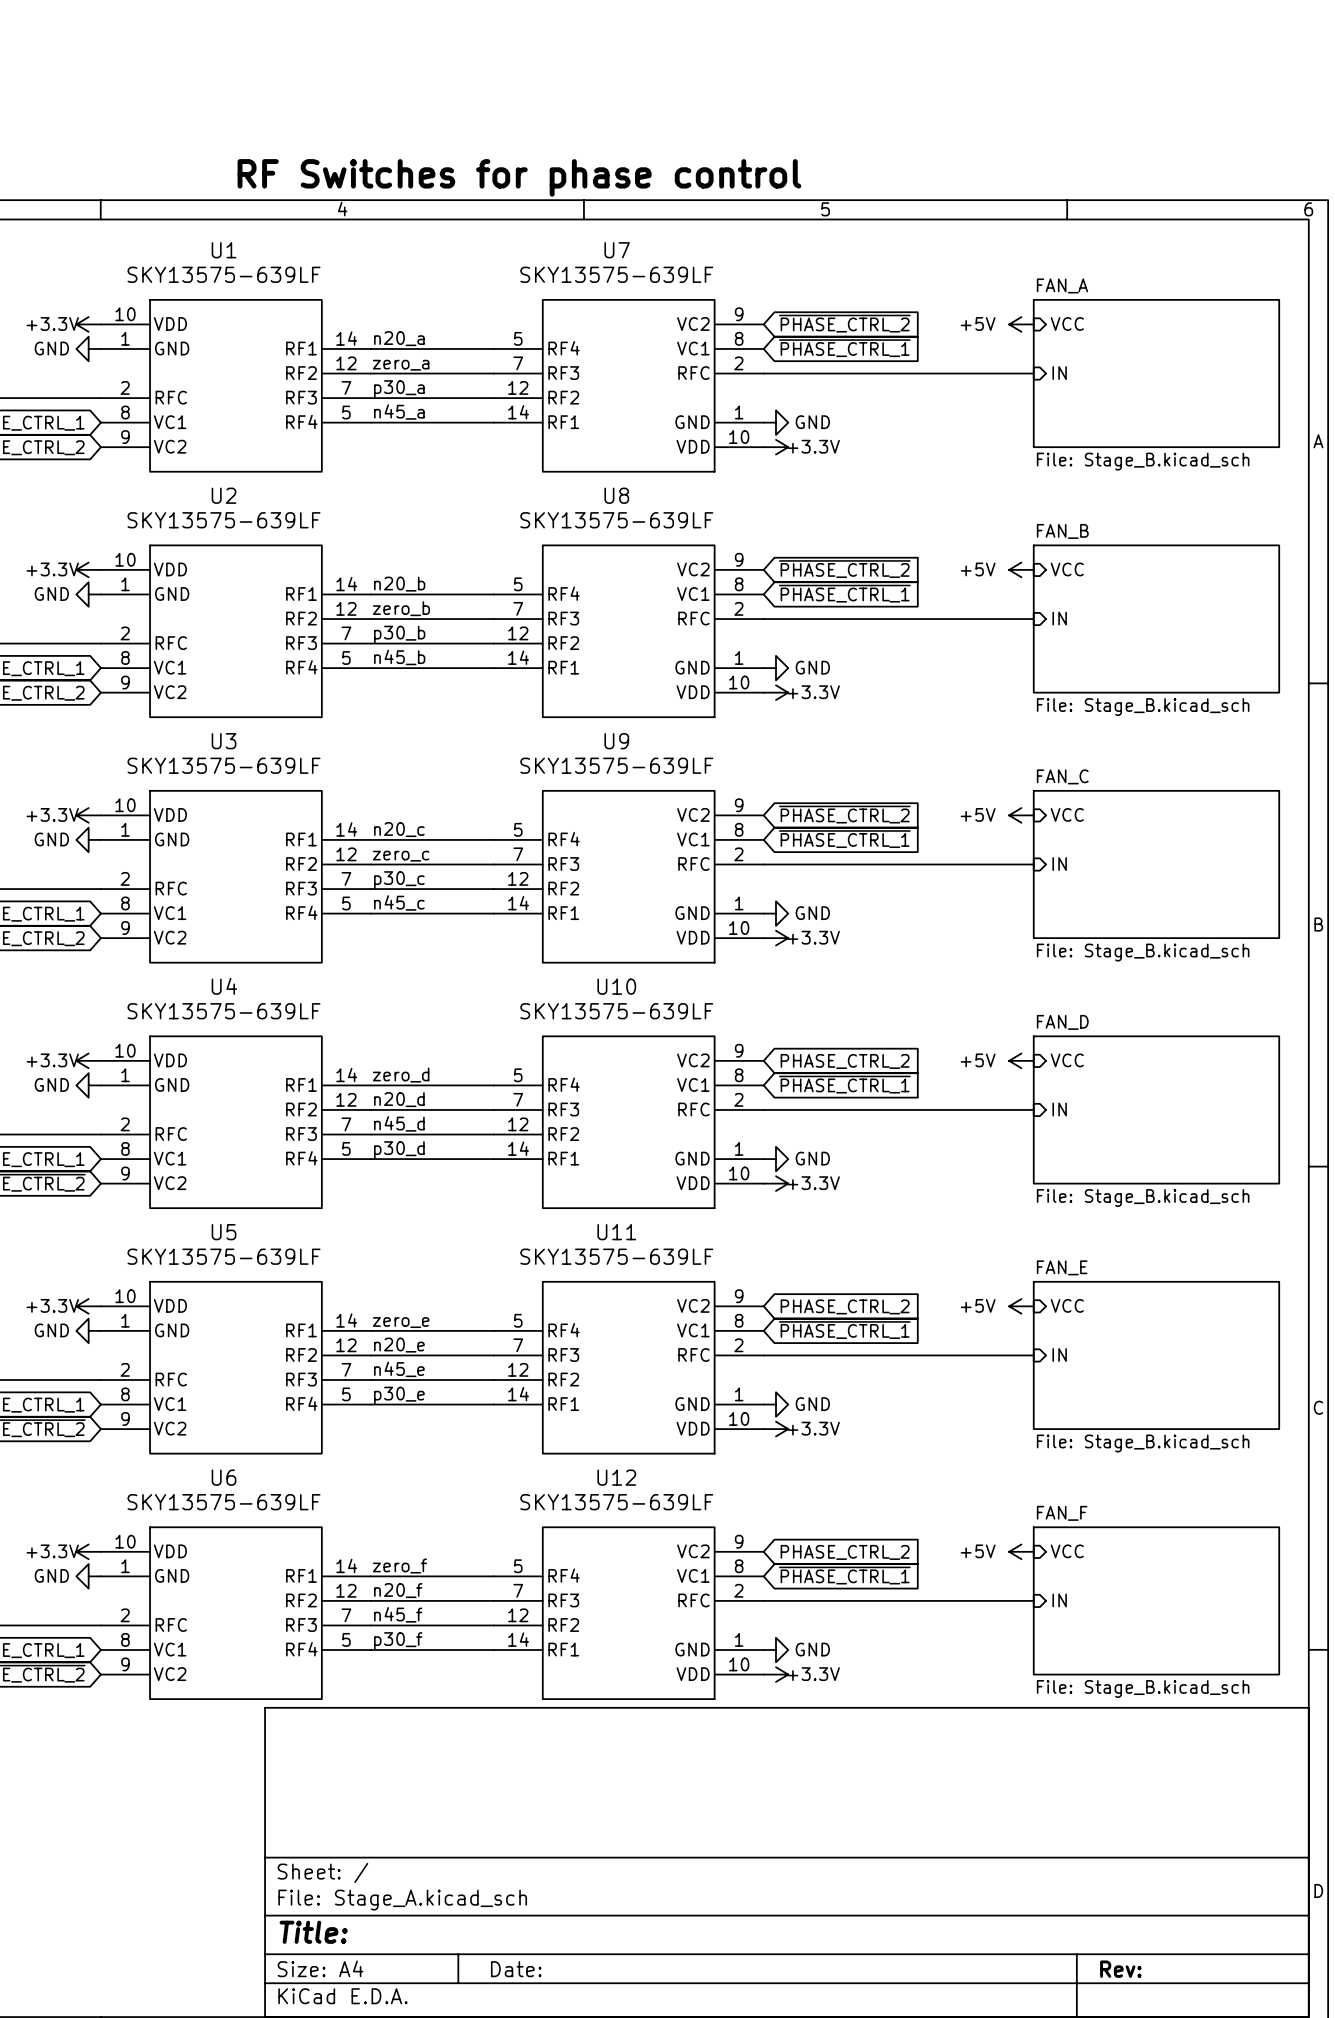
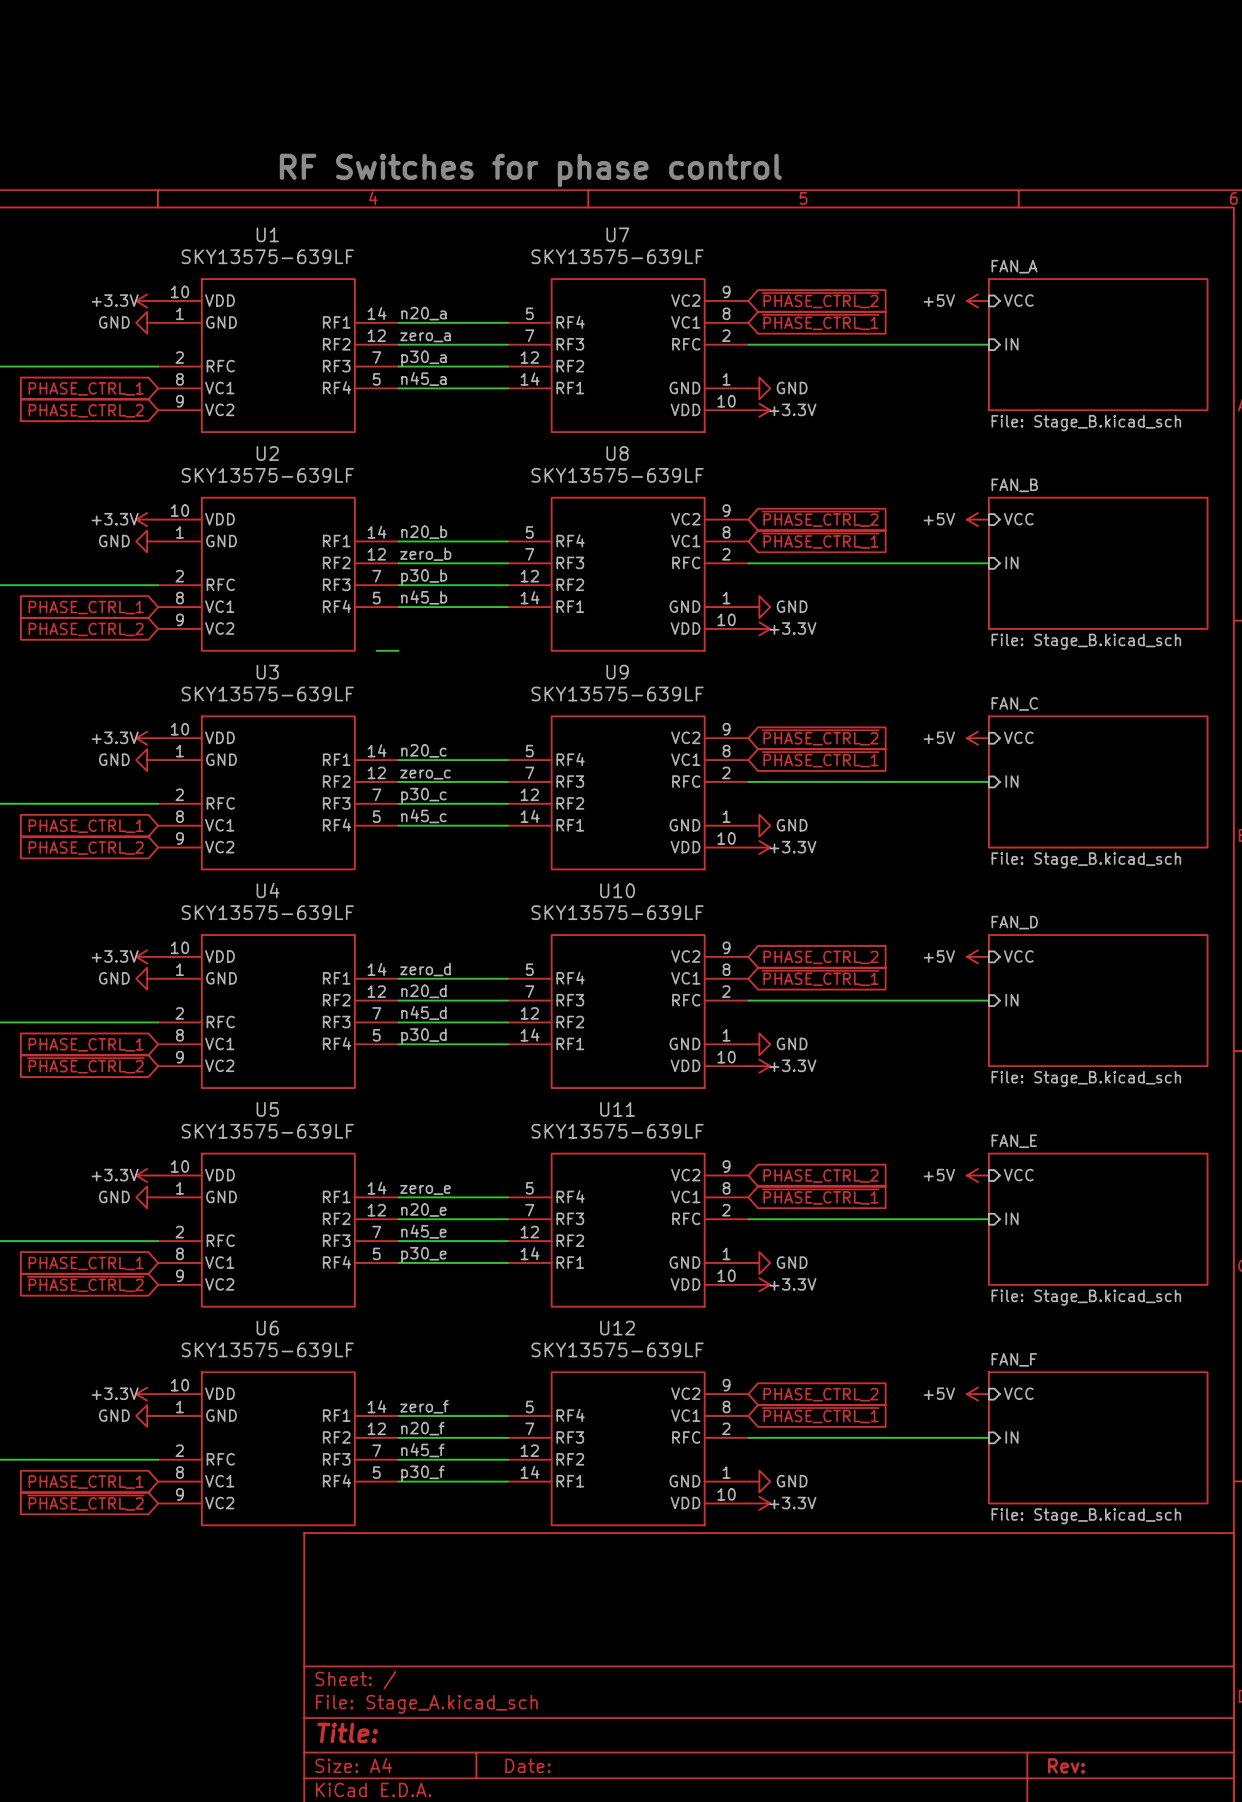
wire: none -> (376, 650) (398, 650)

